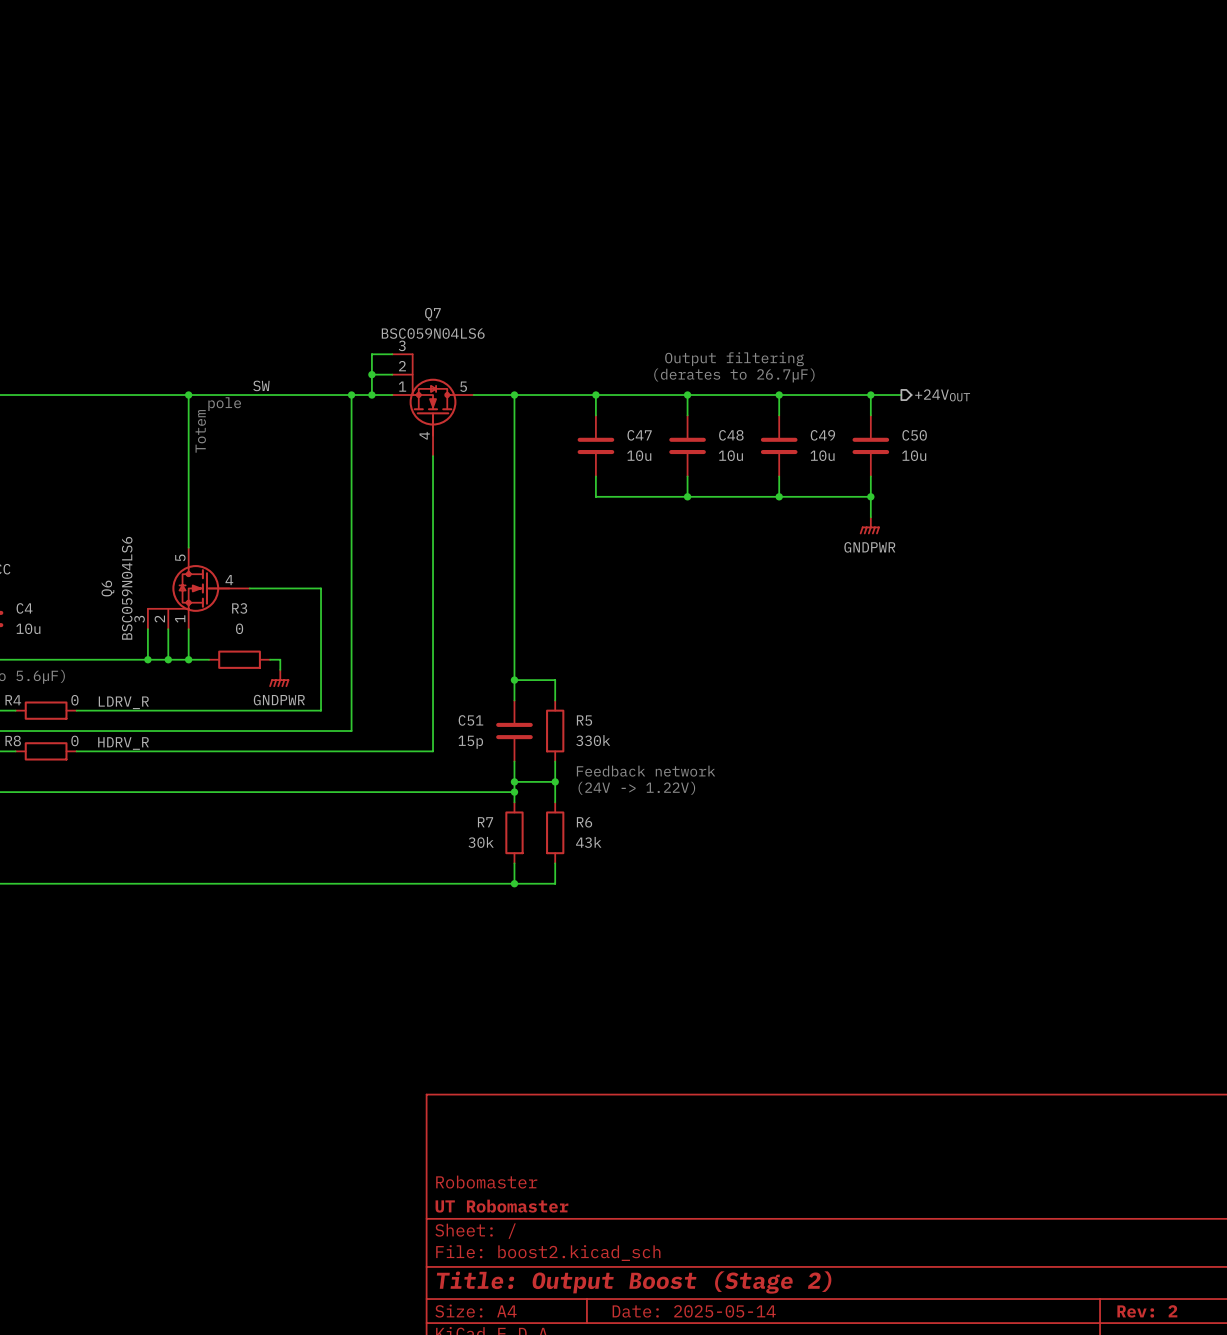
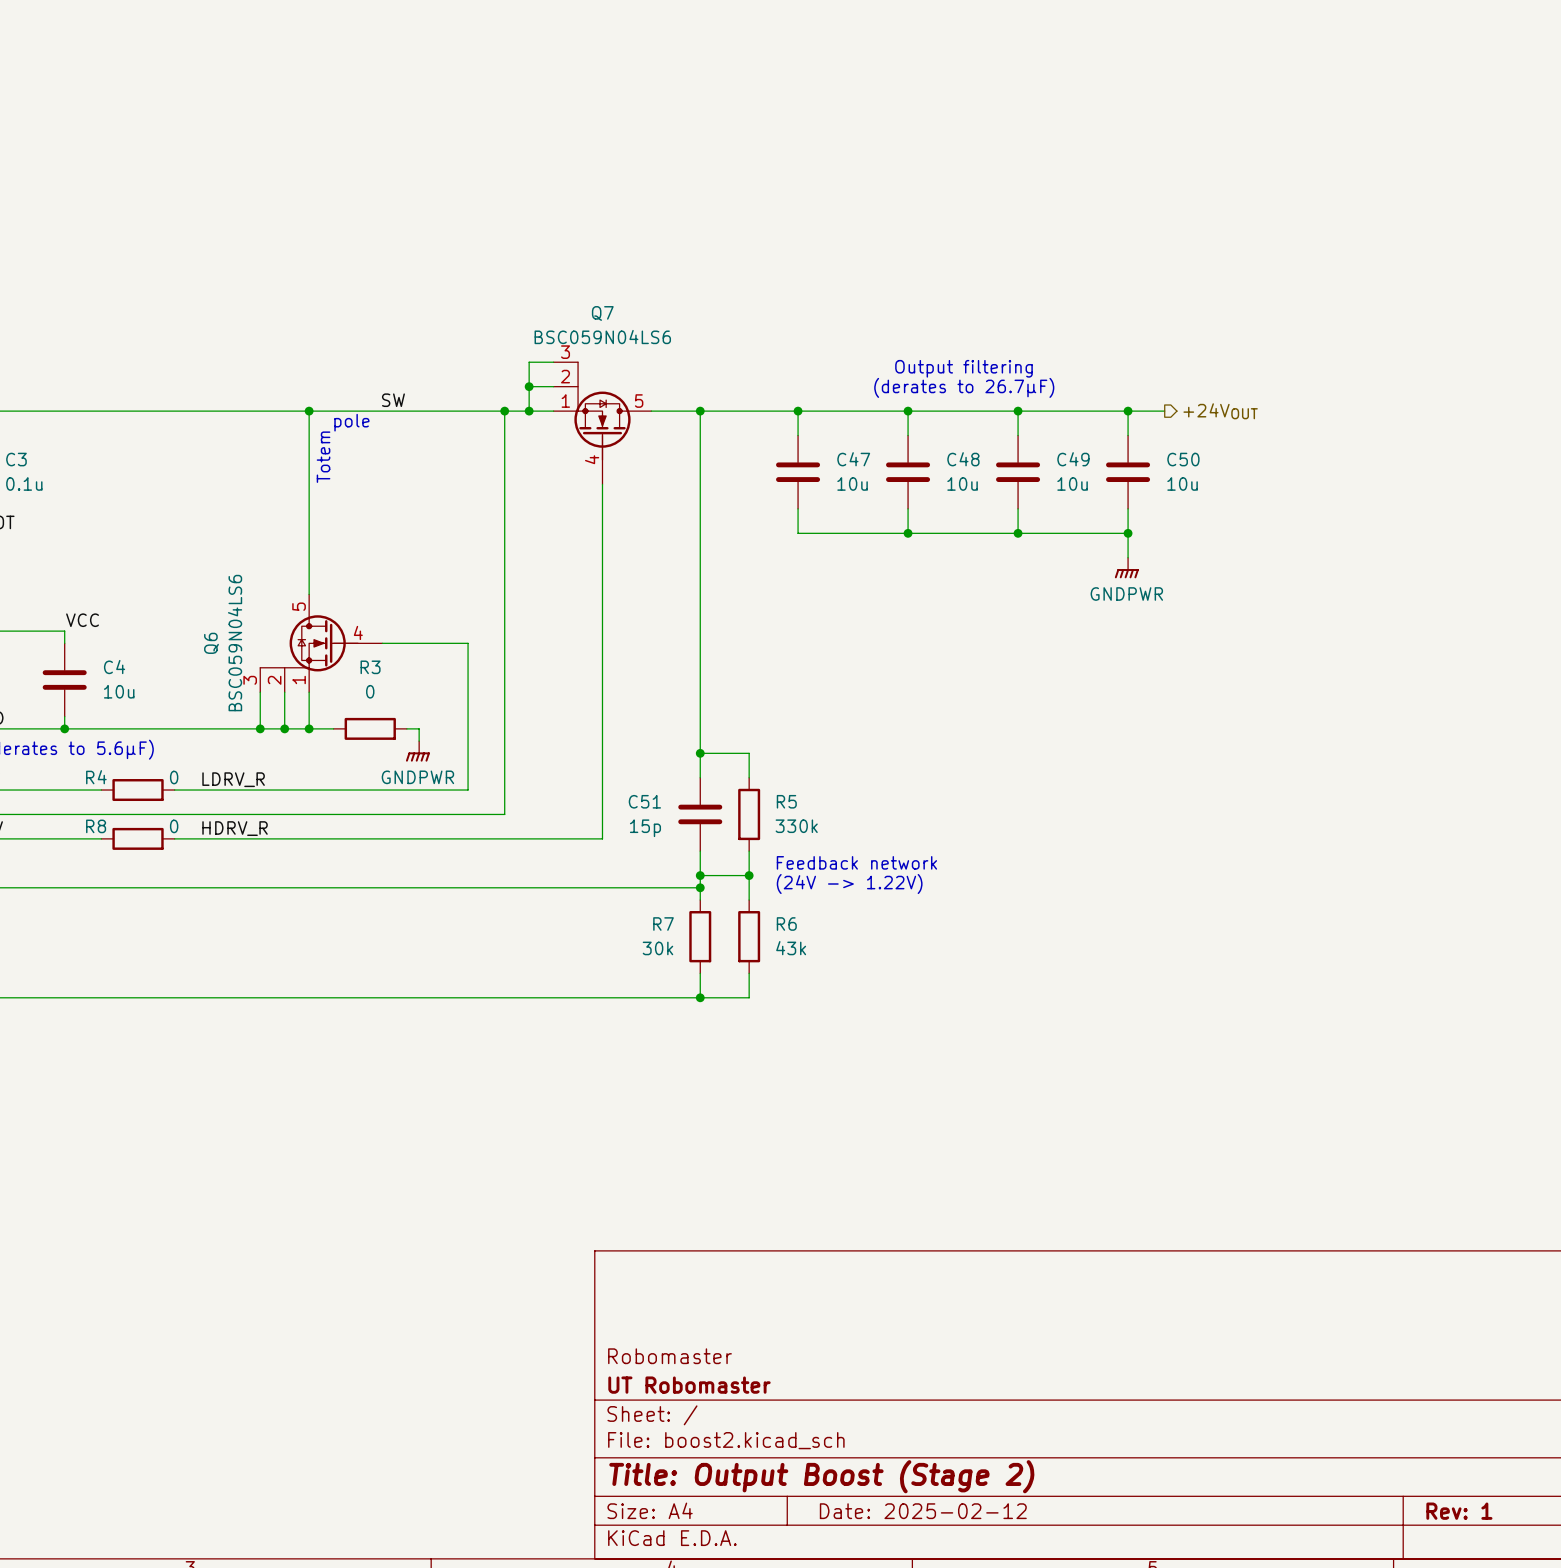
title block: Date: 2025-05-14 (694, 1311) -> Date: 2025-02-12 (923, 1511)
title block: Rev: 2 (1147, 1311) -> Rev: 1 (1459, 1511)

